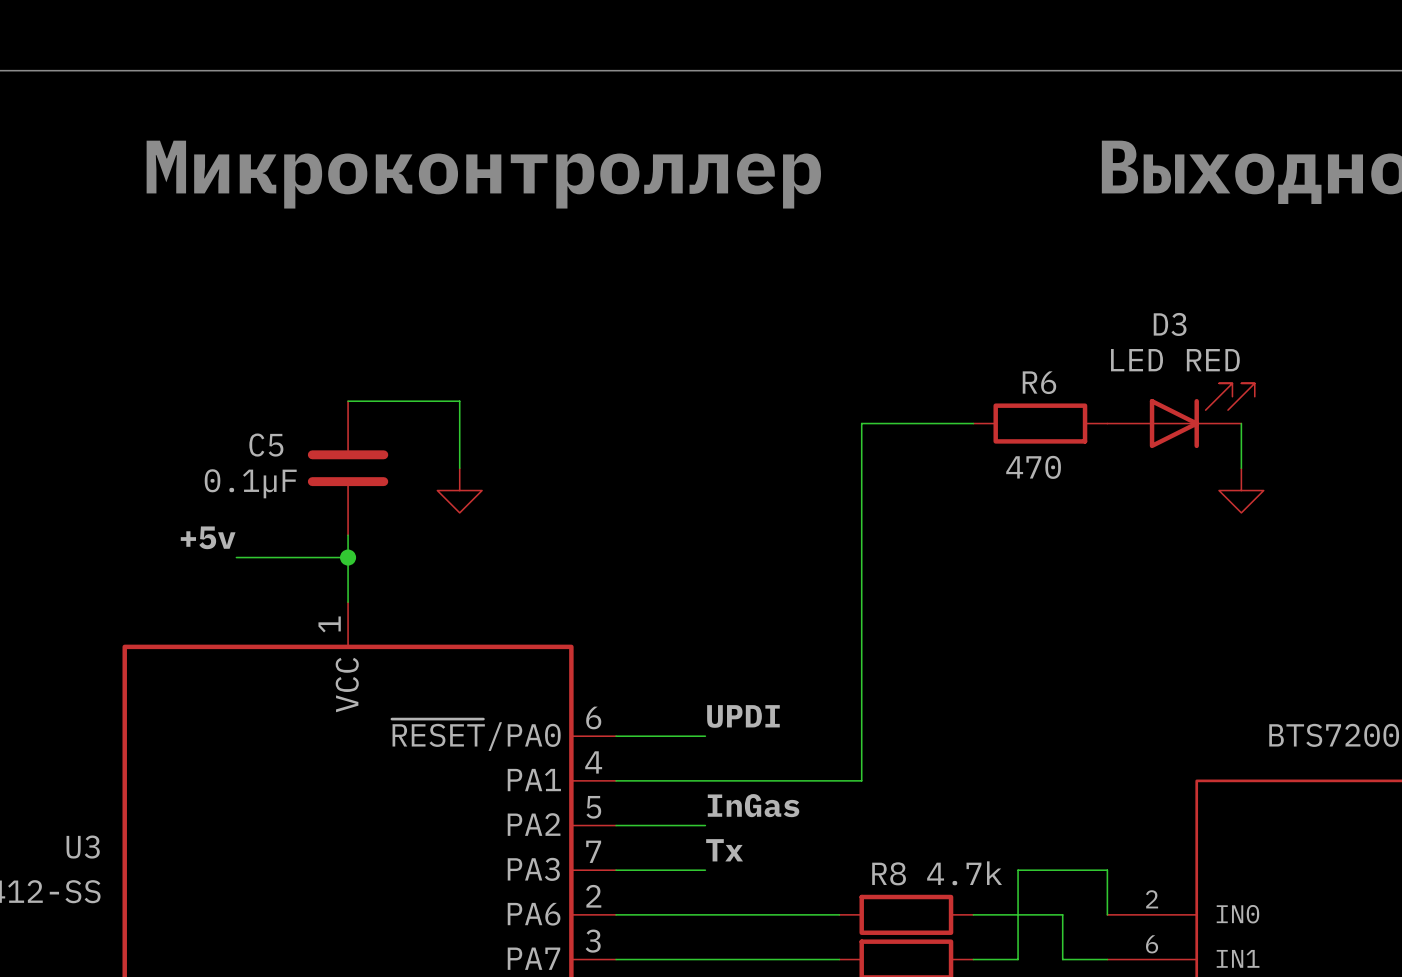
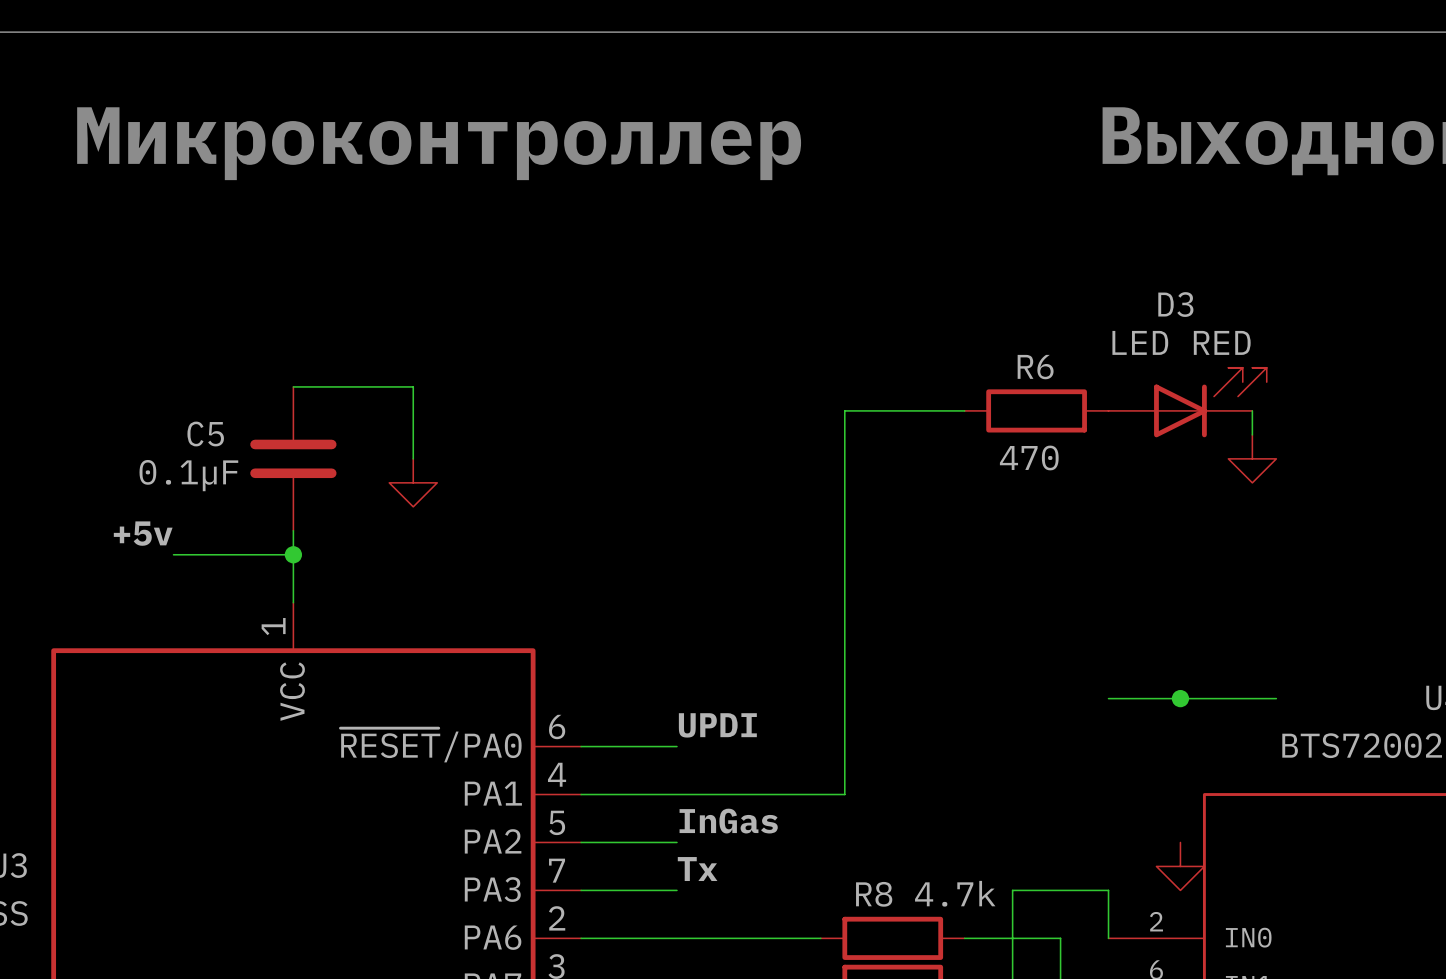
power symbol position: (1241, 490) -> (1252, 458)
wire: none -> (1108, 698) (1276, 698)
junction: none -> (1180, 698)
power symbol: none -> (1180, 866)

